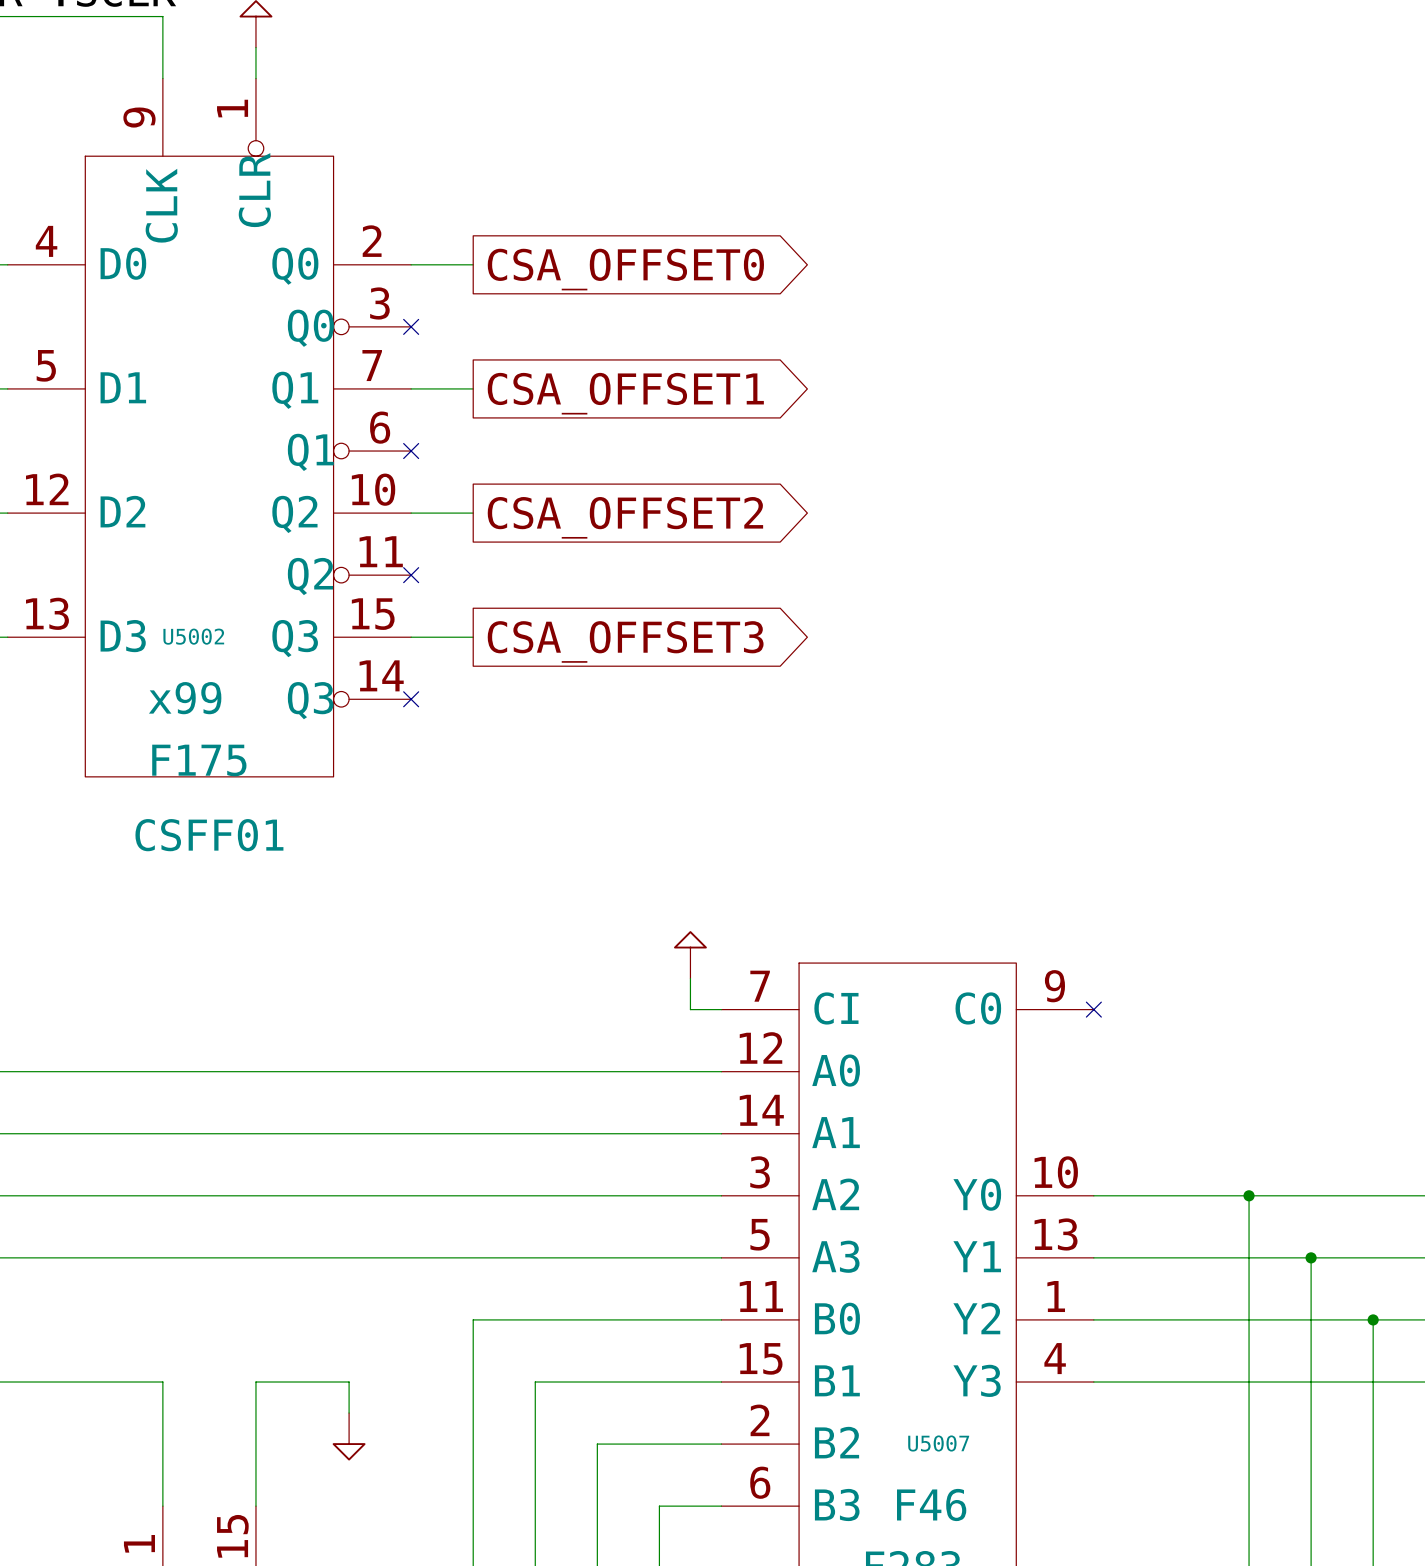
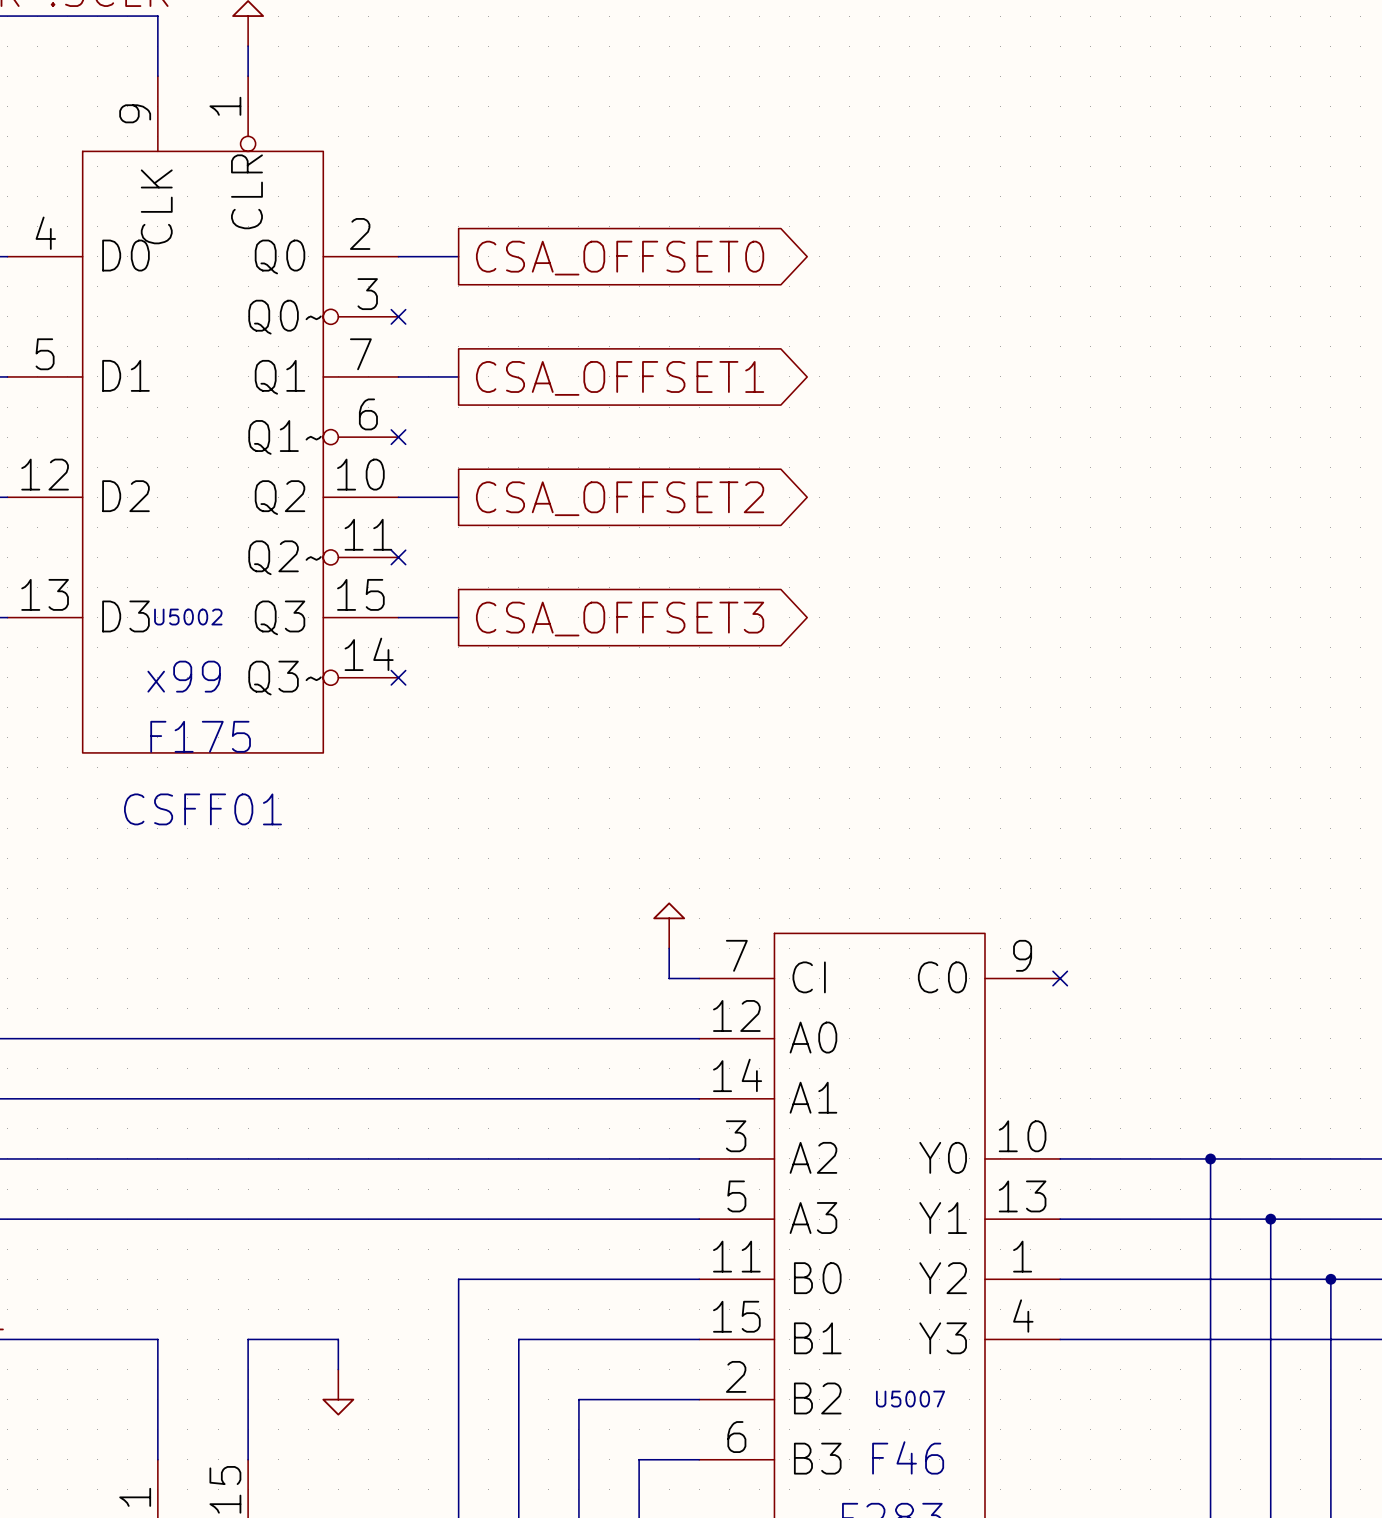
U5002 pin name: Q0 (310, 328) -> Q0~ (285, 317)
U5002 pin name: Q1 (310, 452) -> Q1~ (285, 437)
U5002 pin name: Q2 (310, 576) -> Q2~ (285, 557)
U5002 pin name: Q3 (310, 700) -> Q3~ (285, 678)

